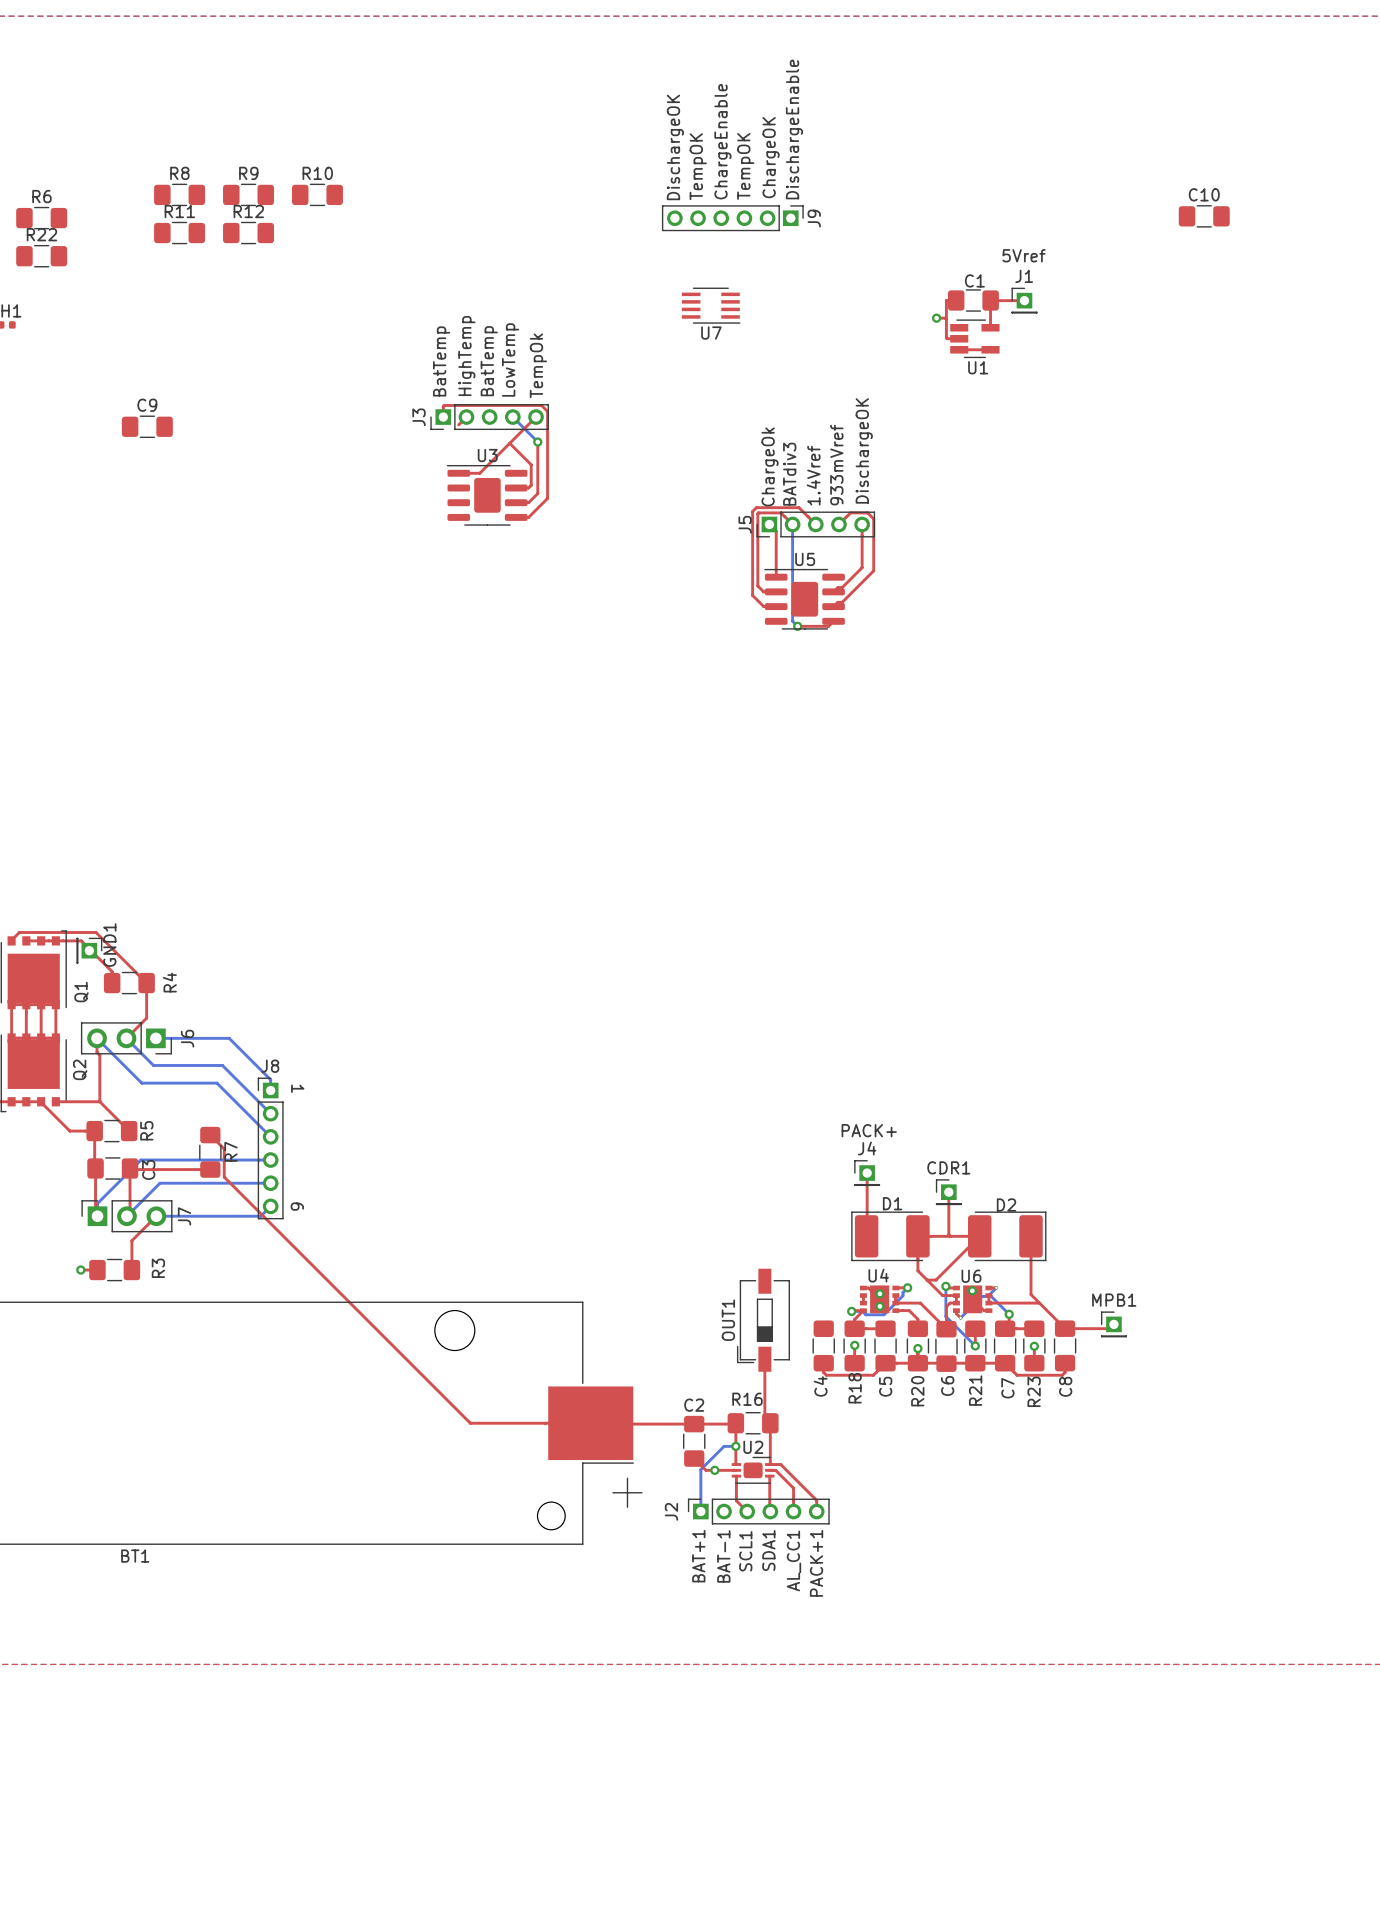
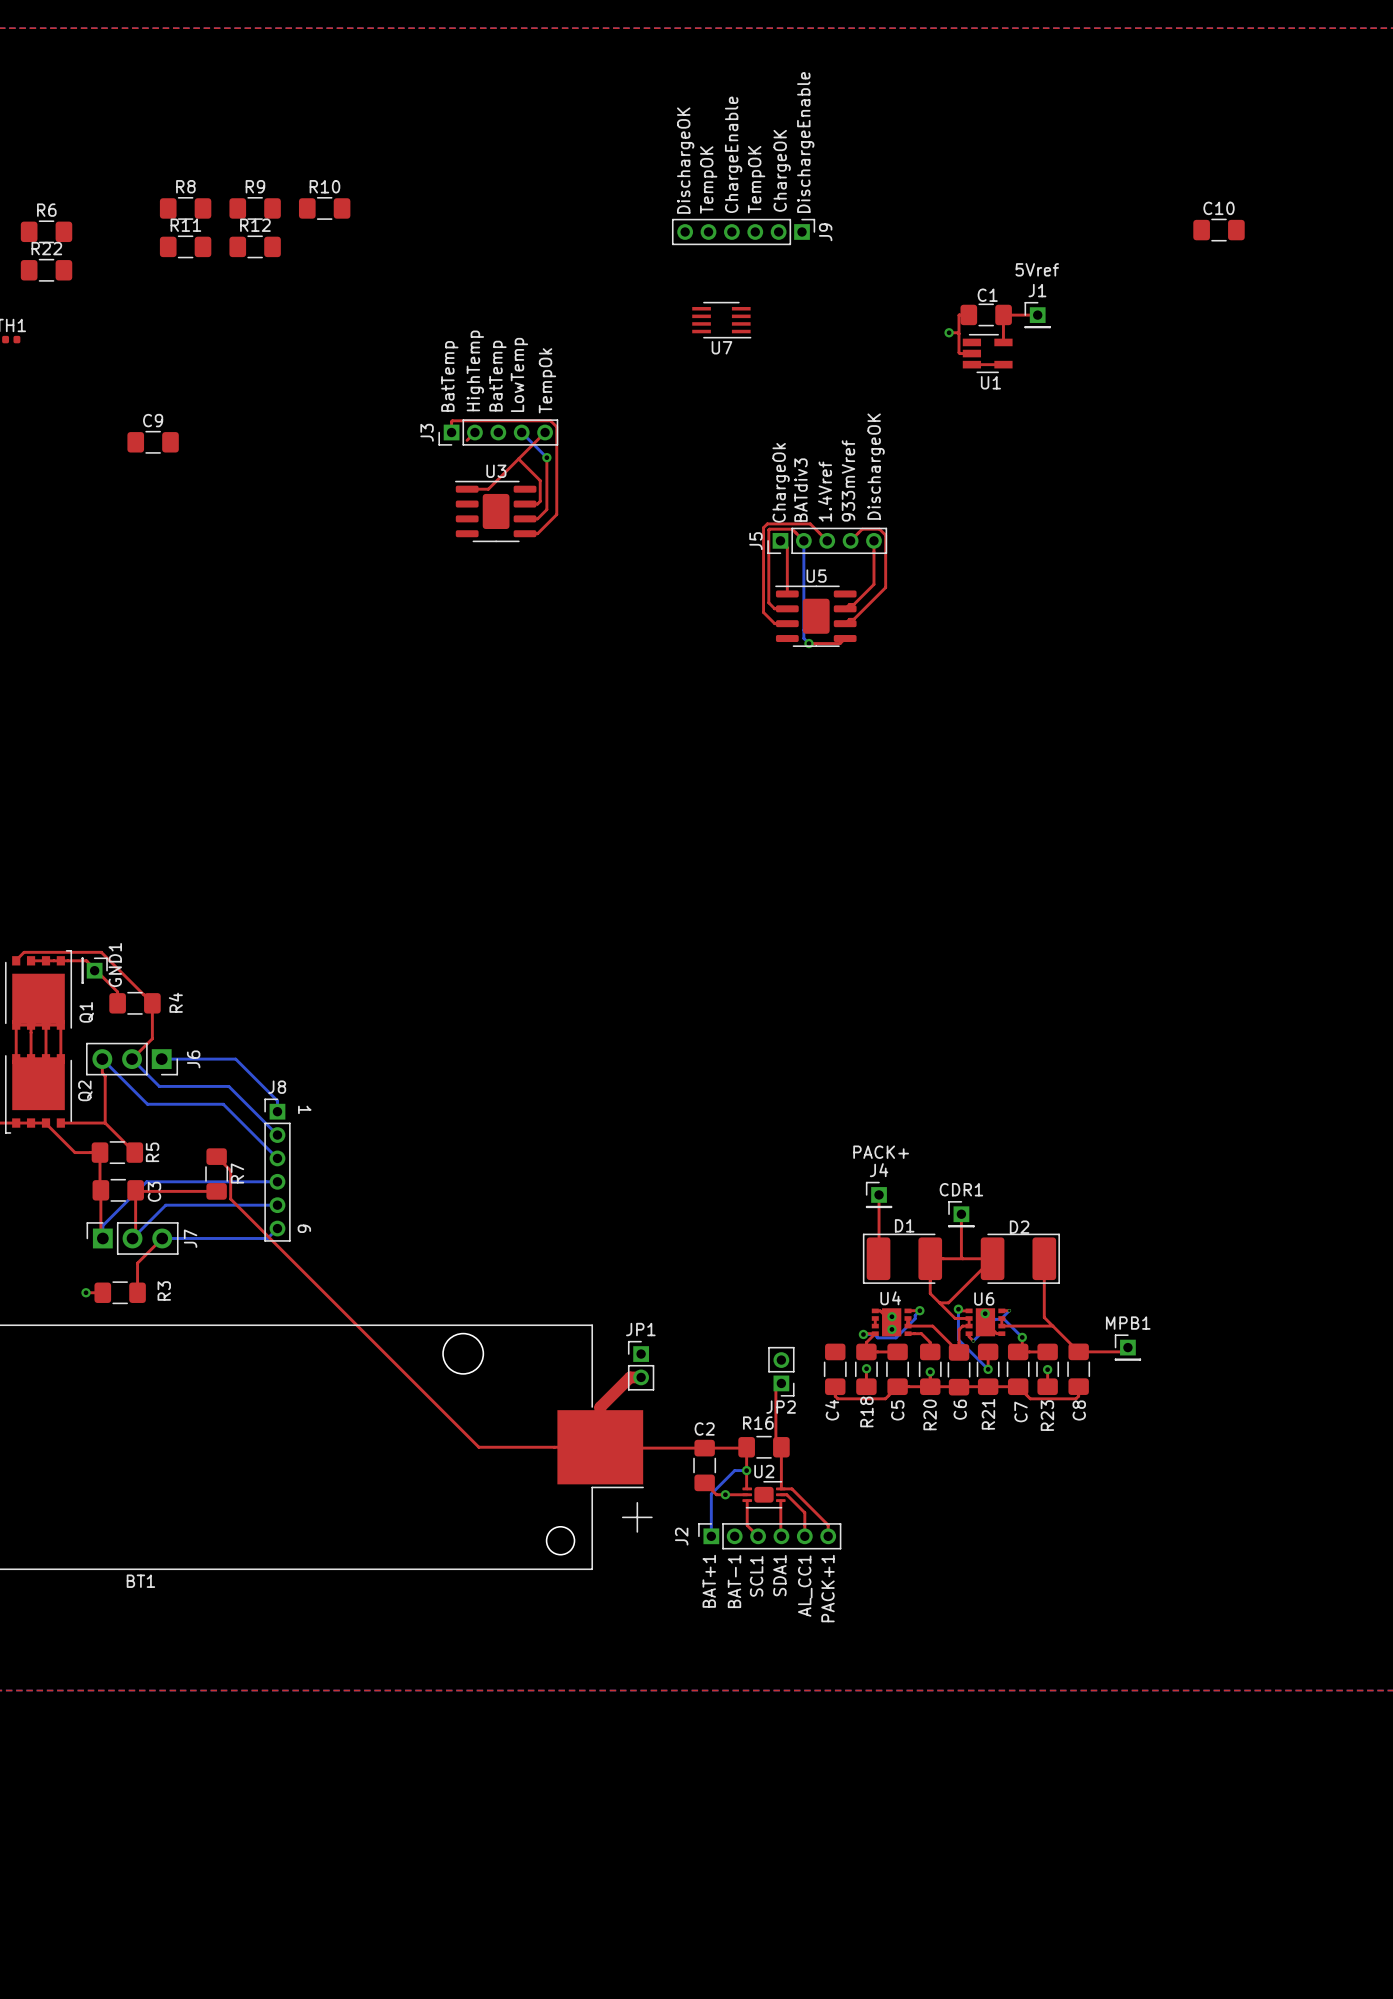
OUT1: (763, 1320) -> none
JP1: none -> (641, 1365)
JP2: none -> (781, 1371)
top track: none -> (641, 1377) (630, 1377) (600, 1407) (600, 1447)

